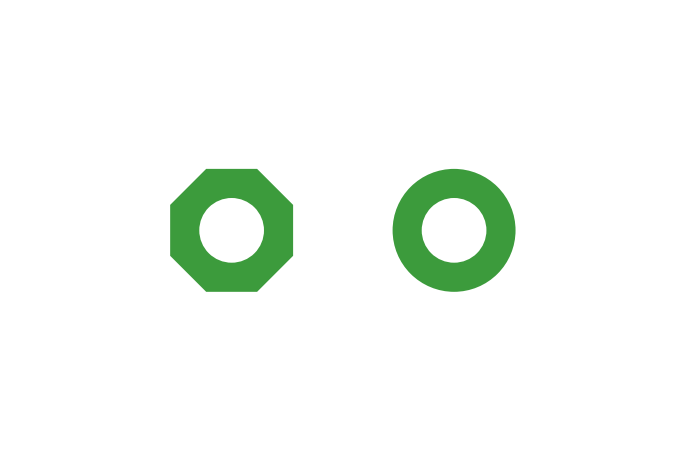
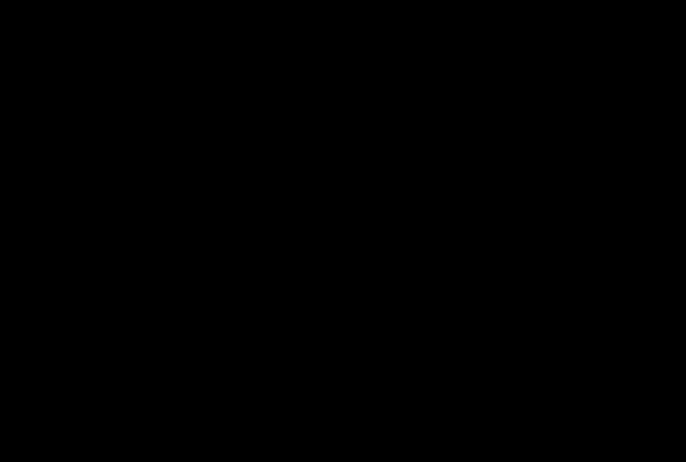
part: (342, 230) -> none

